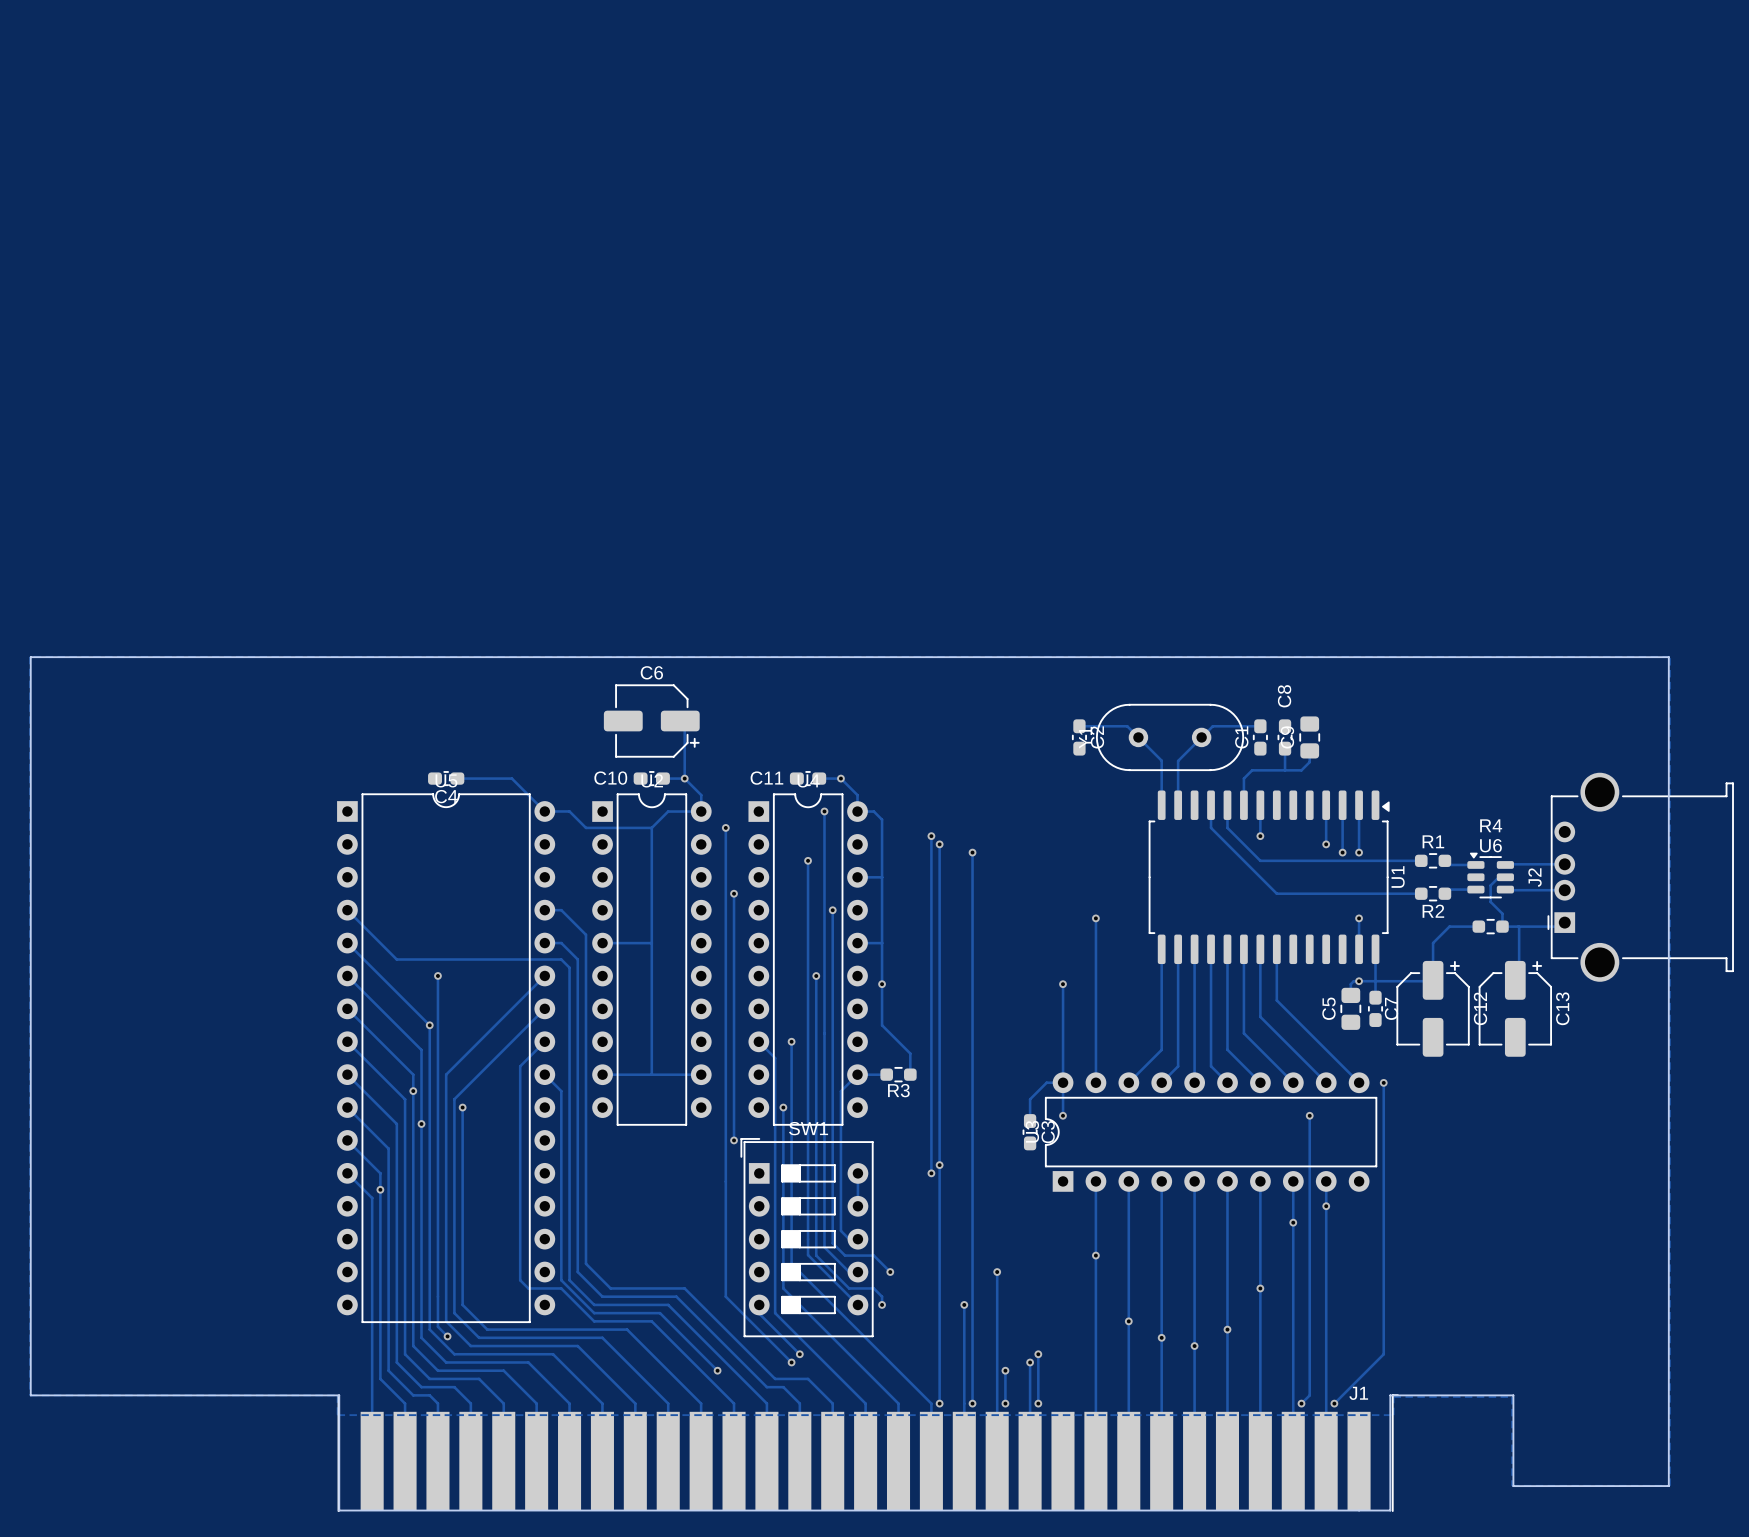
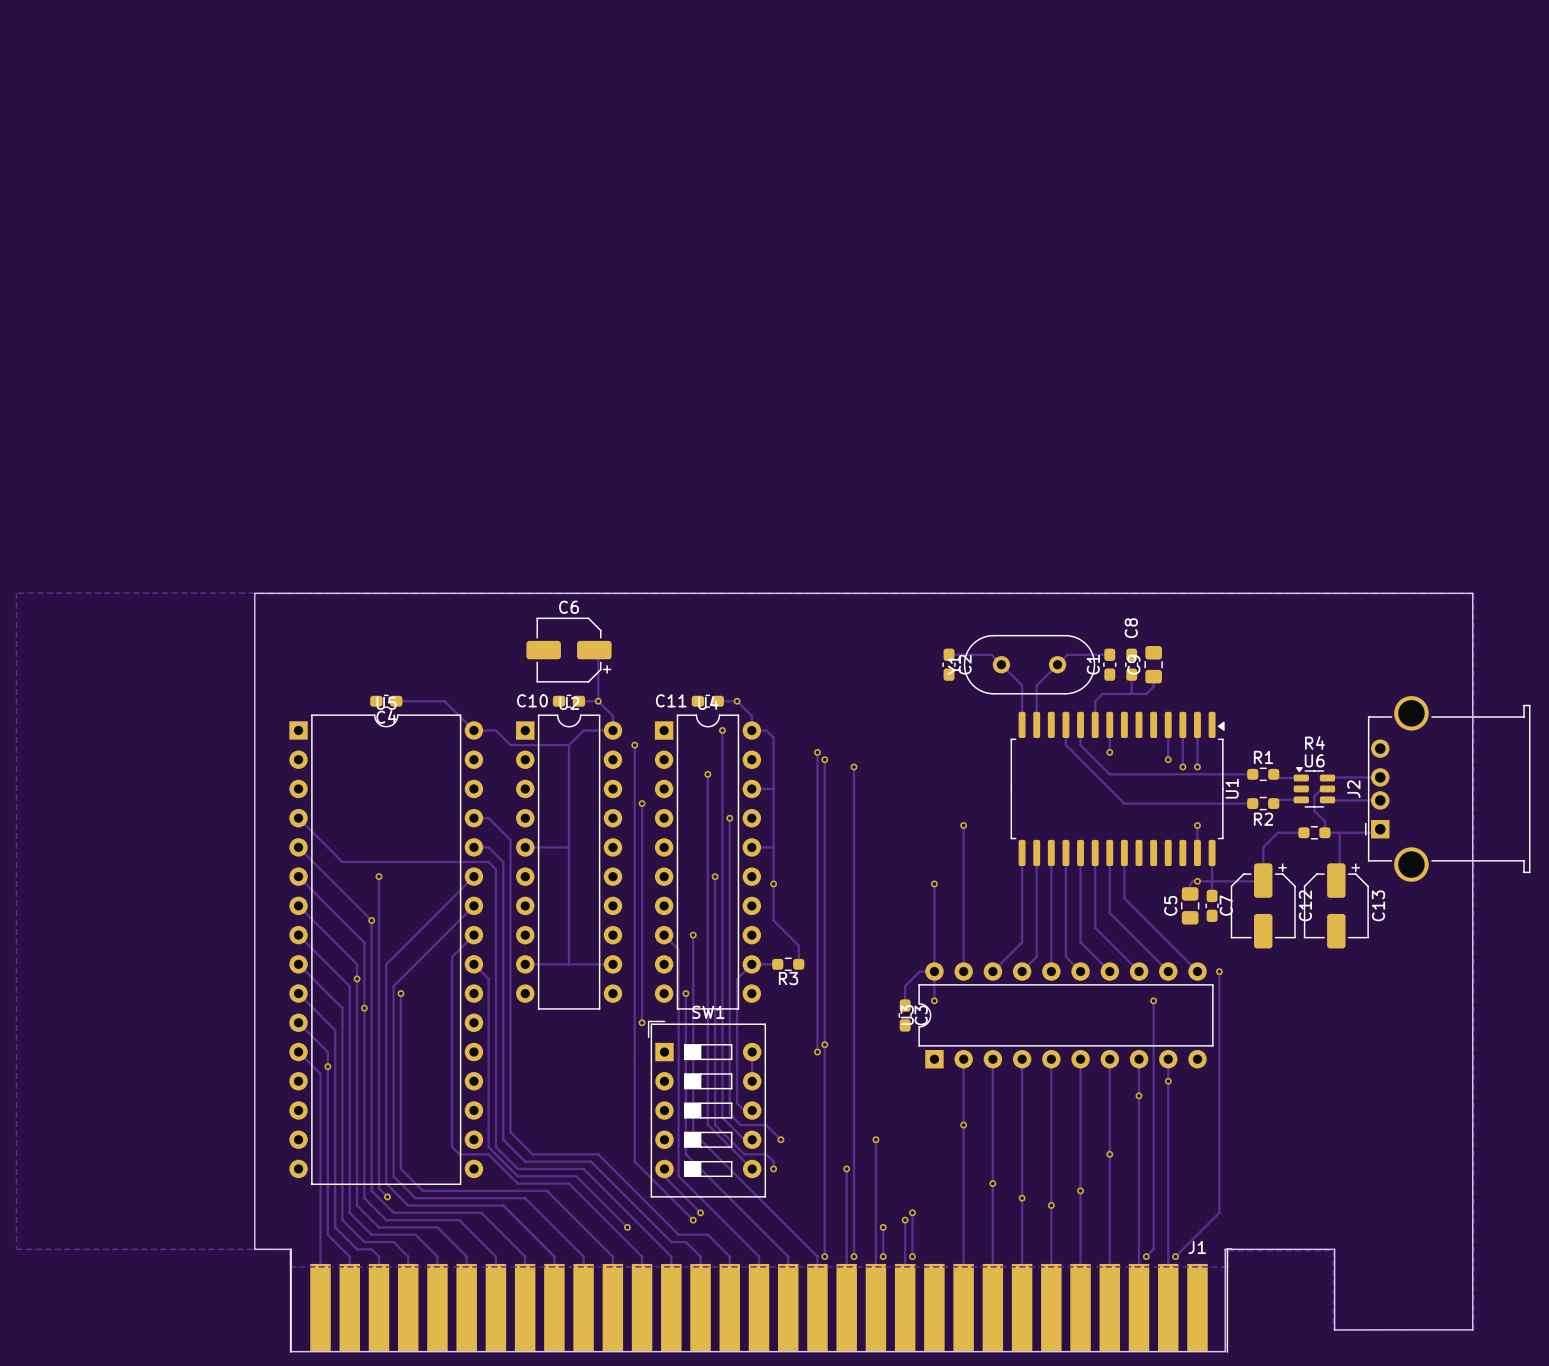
board edge: (298, 657) (30, 657) (30, 1395) (298, 1395) -> (254, 593) (254, 1249)

